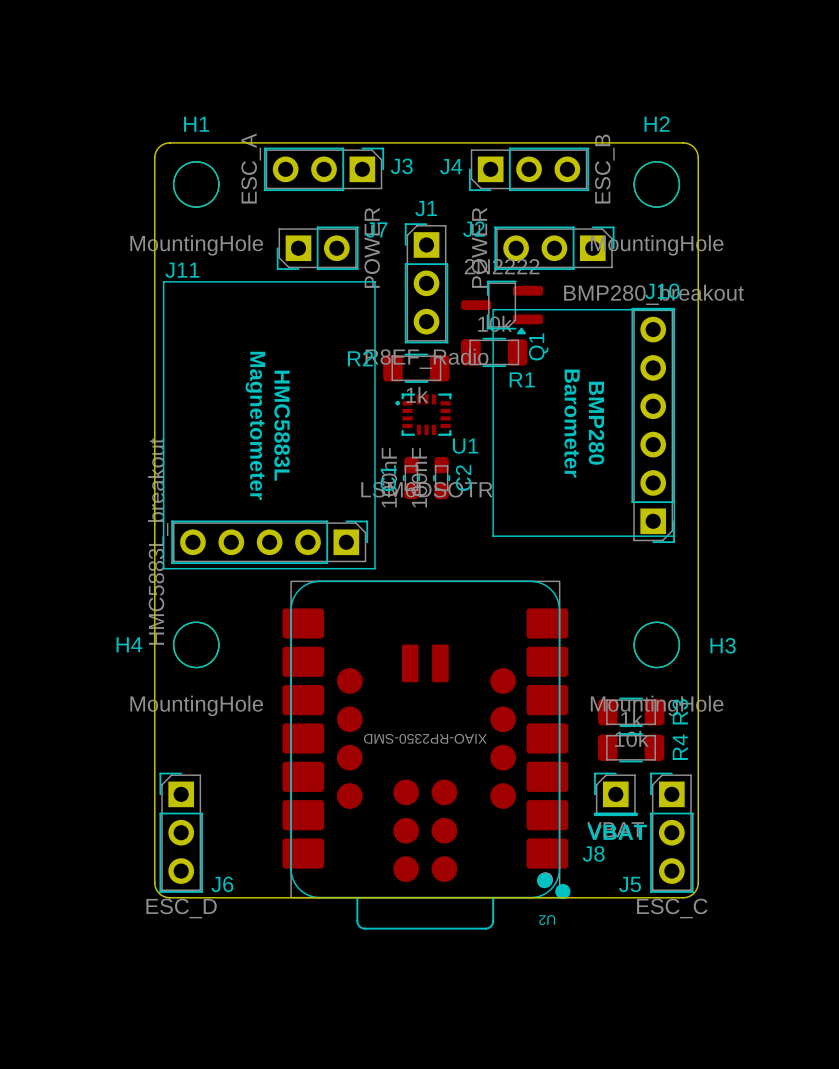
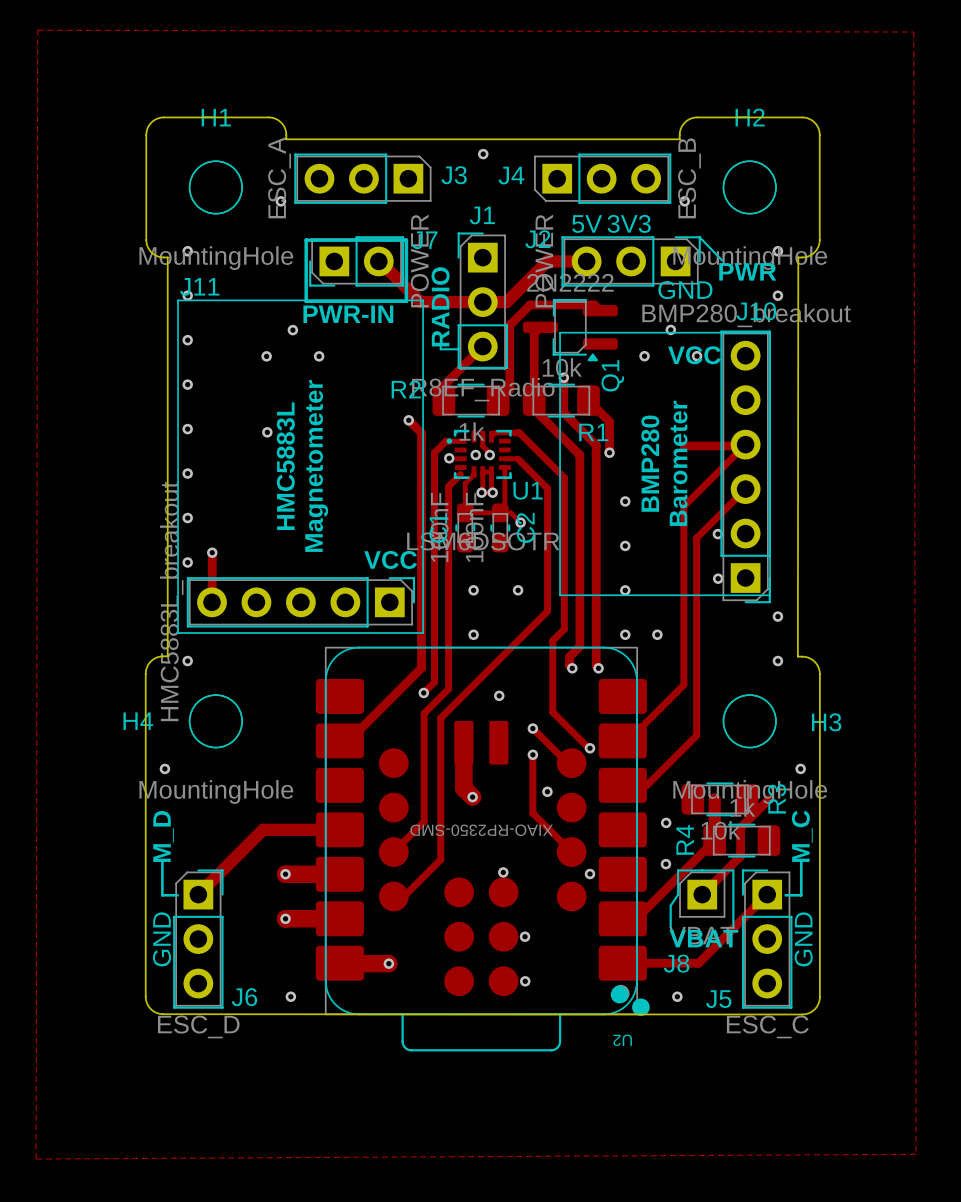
zone outline: none -> (37, 30) (913, 32) (916, 1154) (36, 1159) (37, 30)
board edge: (257, 142) (169, 142) (159, 147) (154, 158) (154, 244) -> (286, 139) (285, 131) (282, 124) (270, 117) (163, 117) (151, 122) (146, 134) (146, 241) (152, 253) (159, 257) (167, 257)
board edge: (596, 142) (684, 143) (693, 147) (698, 156) (698, 882) (693, 893) (683, 897) (169, 897) (161, 895) (157, 890) (154, 882) (154, 588) -> (679, 139) (680, 131) (683, 124) (689, 119) (697, 117) (804, 117) (814, 122) (819, 132) (819, 243) (811, 254) (798, 257) (797, 656) (806, 657) (813, 660) (817, 665) (819, 674) (819, 997) (814, 1009) (802, 1014) (163, 1014) (154, 1011) (148, 1005) (145, 996) (145, 673) (147, 667) (152, 659) (158, 656) (167, 656)
J3 footprint: [263, 147, 385, 192] -> [294, 153, 432, 204]
J4 footprint: [468, 147, 590, 192] -> [534, 153, 672, 204]
via: none -> (483, 154)
via: none -> (280, 201)
via: none -> (684, 201)
text: none -> 5V (587, 224)
text: none -> 3V3 (629, 223)
J1 footprint: [404, 223, 449, 344] -> [457, 232, 506, 370]
line: none -> (699, 237) (722, 260)
line: none -> (306, 240) (406, 240) (406, 301) (306, 301) (306, 240)
via: none -> (187, 251)
via: none -> (777, 251)
track: none -> (378, 261) (420, 302) (506, 302) (547, 261) (586, 261)
text: none -> PWR (747, 271)
text: none -> GND (685, 290)
via: none -> (187, 295)
via: none -> (777, 295)
text: none -> RADIO (440, 306)
track: none -> (600, 310) (594, 304) (530, 304) (509, 325) (509, 388) (498, 400)
text: none -> PWR-IN (348, 314)
line: none -> (458, 325) (458, 367) (506, 367) (506, 325) (458, 325)
track: none -> (540, 327) (534, 333) (534, 409) (579, 455) (579, 646) (569, 656) (569, 665) (572, 668)
via: none -> (292, 330)
via: none -> (670, 329)
via: none -> (187, 340)
line: none -> (440, 344) (440, 349) (458, 349)
track: none -> (482, 346) (443, 385) (443, 400)
via: none -> (644, 356)
text: none -> VCC (694, 355)
via: none -> (697, 356)
via: none -> (266, 356)
via: none -> (319, 356)
track: none -> (563, 377) (563, 412) (596, 445) (596, 665) (598, 668)
via: none -> (563, 377)
R1 position: (494, 352) -> (561, 400)
via: none -> (187, 384)
track: none -> (588, 400) (609, 421) (609, 452)
track: none -> (408, 420) (421, 433) (421, 668) (348, 740) (339, 740)
via: none -> (408, 420)
via: none -> (187, 429)
via: none -> (267, 432)
track: none -> (482, 436) (482, 446) (489, 455)
track: none -> (491, 436) (495, 432) (519, 432) (564, 477) (564, 629) (552, 640) (552, 712) (590, 748)
track: none -> (460, 441) (446, 441) (434, 452) (434, 682) (423, 692)
track: none -> (683, 446) (745, 444) (683, 506) (683, 684) (627, 740) (622, 740)
via: none -> (609, 452)
via: none -> (475, 454)
via: none -> (489, 455)
via: none -> (449, 458)
track: none -> (504, 458) (517, 458) (547, 488) (547, 611) (440, 718) (440, 859) (403, 896) (393, 896)
text: Barometer (572, 423) -> BMP280 (650, 463)
text: BMP280 (596, 423) -> Barometer (678, 463)
text: Magnetometer (255, 425) -> HMC5883L (285, 466)
text: HMC5883L (282, 425) -> Magnetometer (316, 466)
track: none -> (504, 467) (504, 508) (500, 512)
track: none -> (474, 472) (474, 474) (465, 483) (465, 512) (510, 512) (520, 522)
track: none -> (482, 472) (491, 472) (492, 492) (481, 492) (482, 472)
via: none -> (187, 473)
track: none -> (460, 474) (448, 486) (448, 688) (424, 713) (424, 821) (393, 851)
track: none -> (745, 489) (696, 538) (696, 735) (646, 785) (622, 785)
via: none -> (481, 492)
via: none -> (492, 492)
via: none -> (625, 501)
via: none -> (187, 518)
via: none -> (520, 522)
via: none -> (717, 534)
via: none -> (625, 545)
track: none -> (212, 552) (211, 602)
via: none -> (212, 552)
text: none -> VCC (390, 559)
via: none -> (187, 562)
via: none -> (718, 578)
via: none -> (473, 590)
via: none -> (518, 590)
via: none -> (625, 590)
via: none -> (777, 616)
via: none -> (473, 634)
via: none -> (625, 634)
via: none -> (657, 634)
via: none -> (187, 661)
via: none -> (777, 661)
via: none -> (572, 668)
via: none -> (598, 668)
via: none -> (423, 692)
via: none -> (499, 695)
track: none -> (532, 728) (567, 763) (571, 763)
via: none -> (532, 728)
track: none -> (463, 742) (463, 788) (472, 797)
via: none -> (590, 748)
track: none -> (532, 754) (532, 813) (571, 852)
via: none -> (532, 754)
via: none -> (164, 768)
via: none -> (800, 768)
via: none -> (547, 791)
via: none -> (472, 797)
track: none -> (714, 799) (714, 840) (636, 918) (622, 918)
track: none -> (768, 799) (740, 827) (740, 856) (702, 894)
via: none -> (666, 822)
track: none -> (339, 829) (263, 829) (198, 894)
text: none -> M_D (163, 836)
text: none -> M_C (802, 836)
R4 position: (631, 747) -> (741, 840)
R4 name position: R4 (680, 747) -> R4 (685, 839)
line: none -> (162, 860) (162, 895) (177, 895)
line: none -> (801, 860) (801, 895) (785, 895)
via: none -> (665, 864)
J6 footprint: [159, 772, 203, 893] -> [173, 869, 224, 1009]
J8 footprint: [594, 772, 638, 817] -> [677, 869, 726, 918]
line: none -> (702, 870) (733, 870)
line: none -> (733, 870) (733, 926)
via: none -> (503, 872)
track: none -> (285, 874) (339, 874)
via: none -> (285, 874)
via: none -> (590, 874)
line: none -> (678, 894) (670, 905) (670, 926)
track: none -> (767, 894) (698, 963) (622, 963)
track: none -> (285, 918) (339, 918)
via: none -> (285, 918)
via: none -> (525, 936)
text: none -> GND (161, 939)
text: none -> GND (803, 939)
track: none -> (339, 963) (388, 963)
via: none -> (388, 963)
via: none -> (525, 981)
via: none -> (290, 996)
via: none -> (677, 996)

